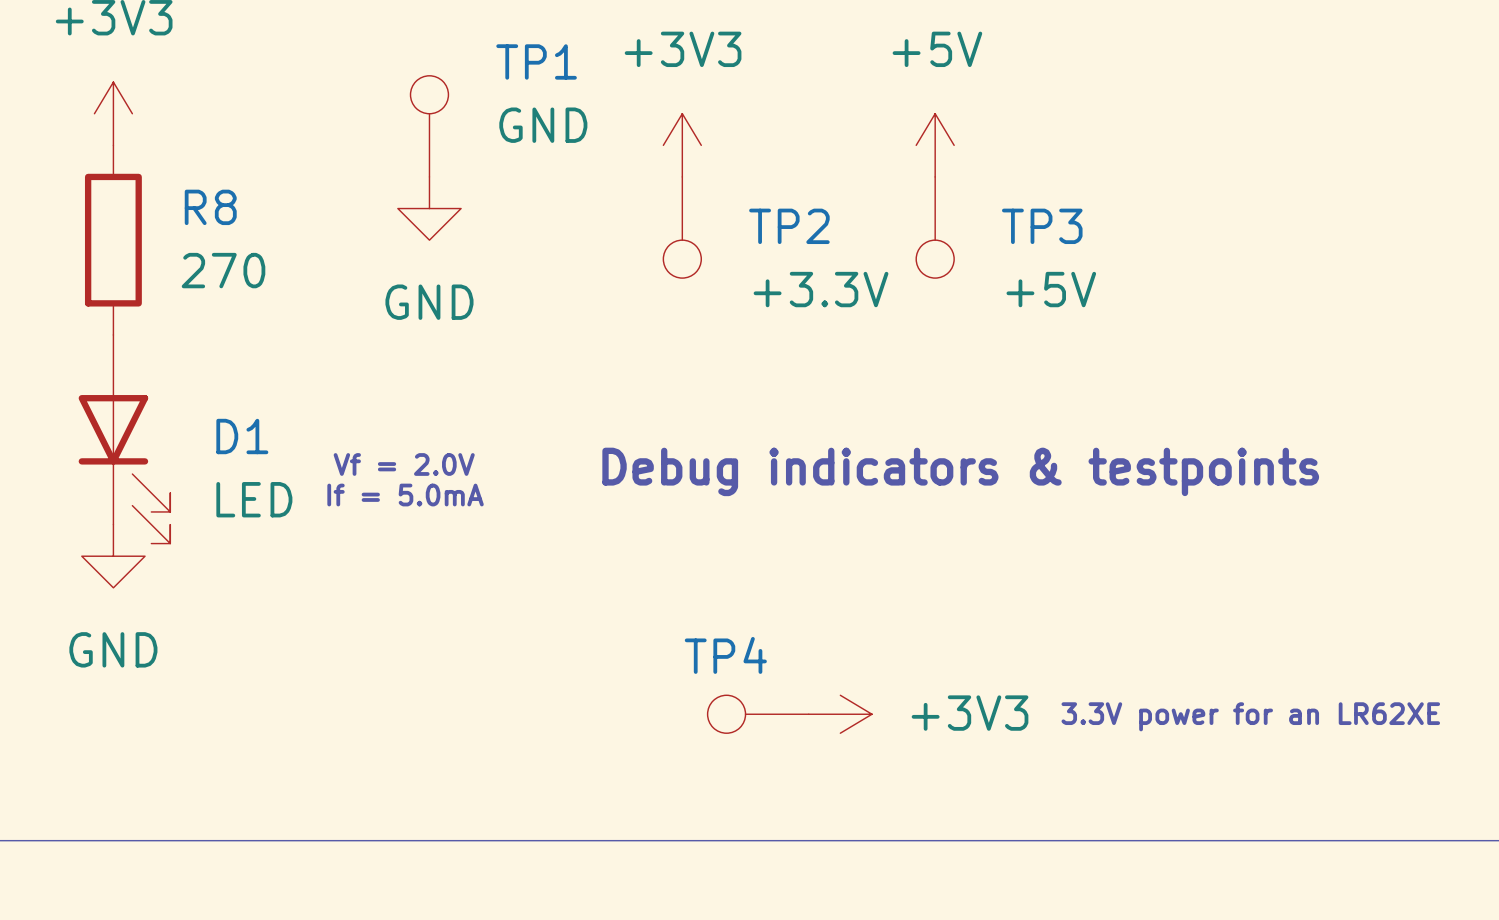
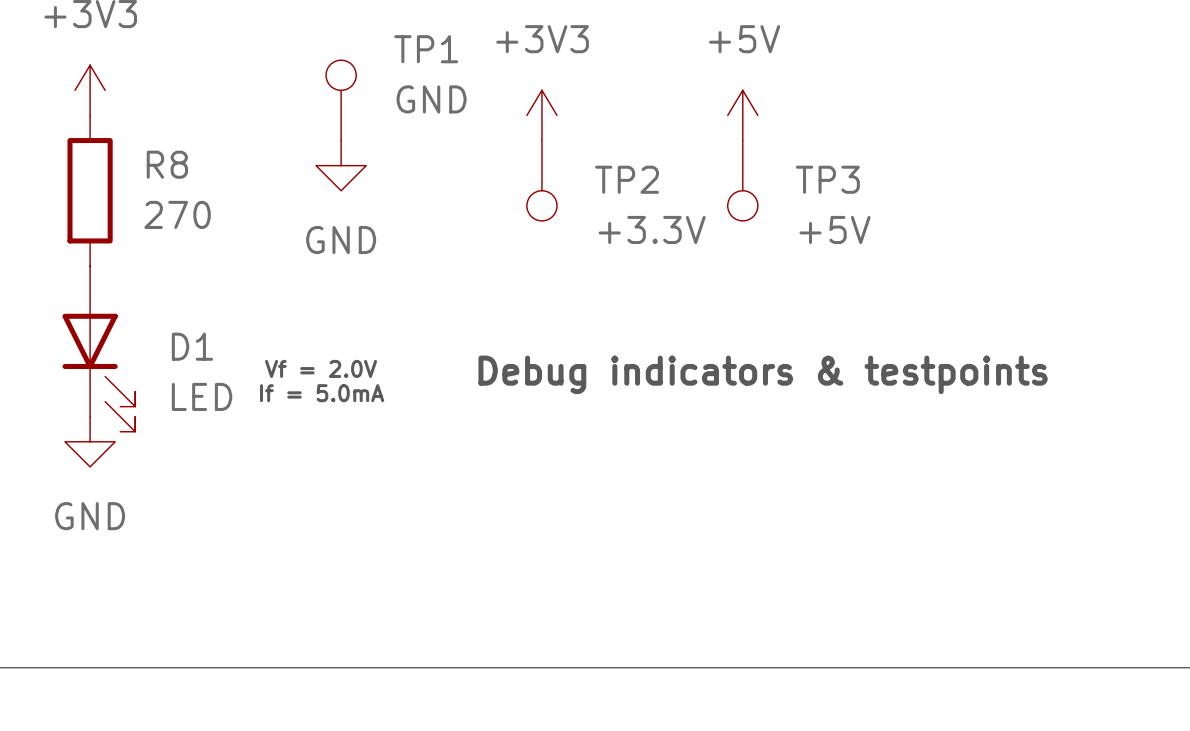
TP4: (758, 714) -> none
power symbol: +3V3 (840, 714) -> none
text: 3.3V power for an LR62XE (1250, 716) -> none

